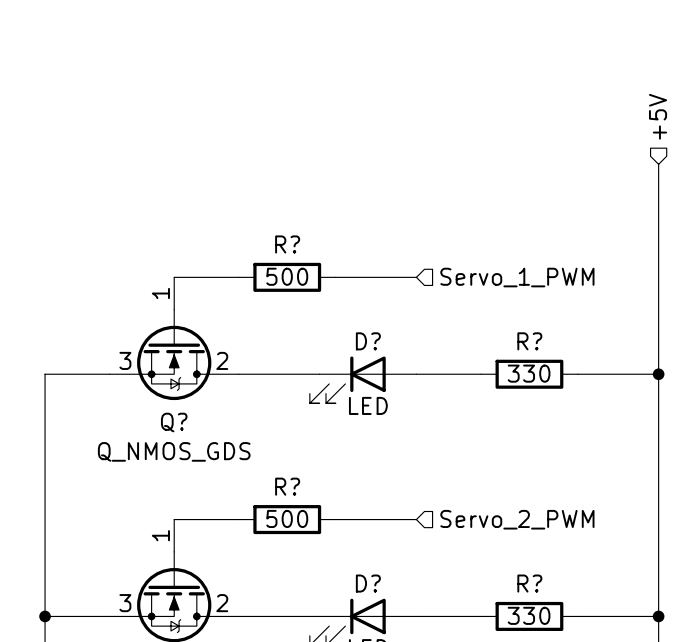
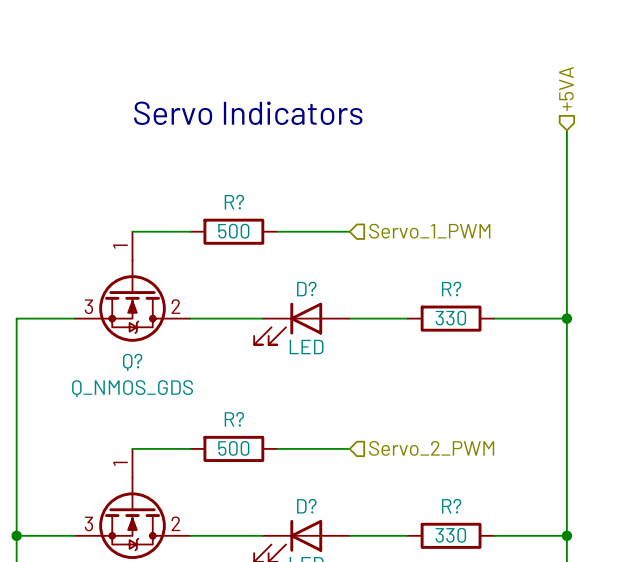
hierarchical label: +5V (658, 116) -> +5VA (566, 89)
text: none -> Servo Indicators (248, 113)

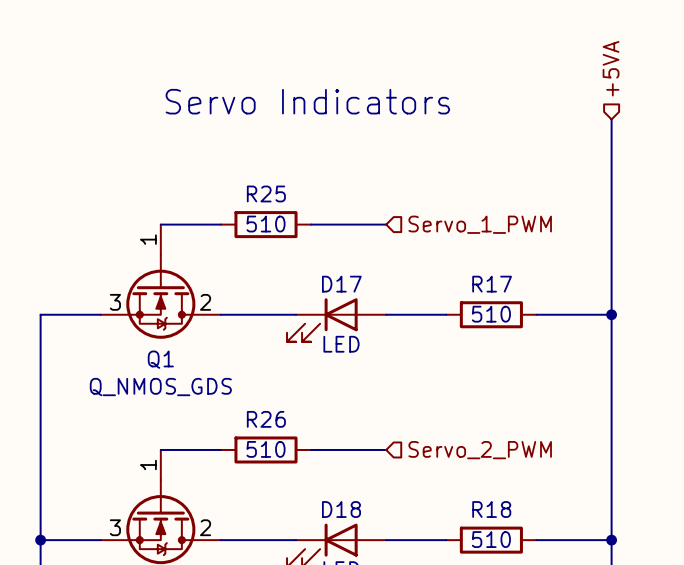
R? name: R? (234, 202) -> R25 (266, 193)
R? value: 500 (233, 231) -> 510 (266, 224)
D? name: D? (306, 289) -> D17 (341, 284)
R? name: R? (451, 289) -> R17 (492, 284)
R? value: 330 (450, 318) -> 510 (491, 314)
Q? name: Q? (132, 362) -> Q1 (160, 359)
R? name: R? (234, 419) -> R26 (266, 419)
R? value: 500 (233, 448) -> 510 (266, 449)
D? name: D? (306, 506) -> D18 (341, 509)
R? name: R? (451, 506) -> R18 (491, 509)
R? value: 330 (450, 535) -> 510 (491, 539)

